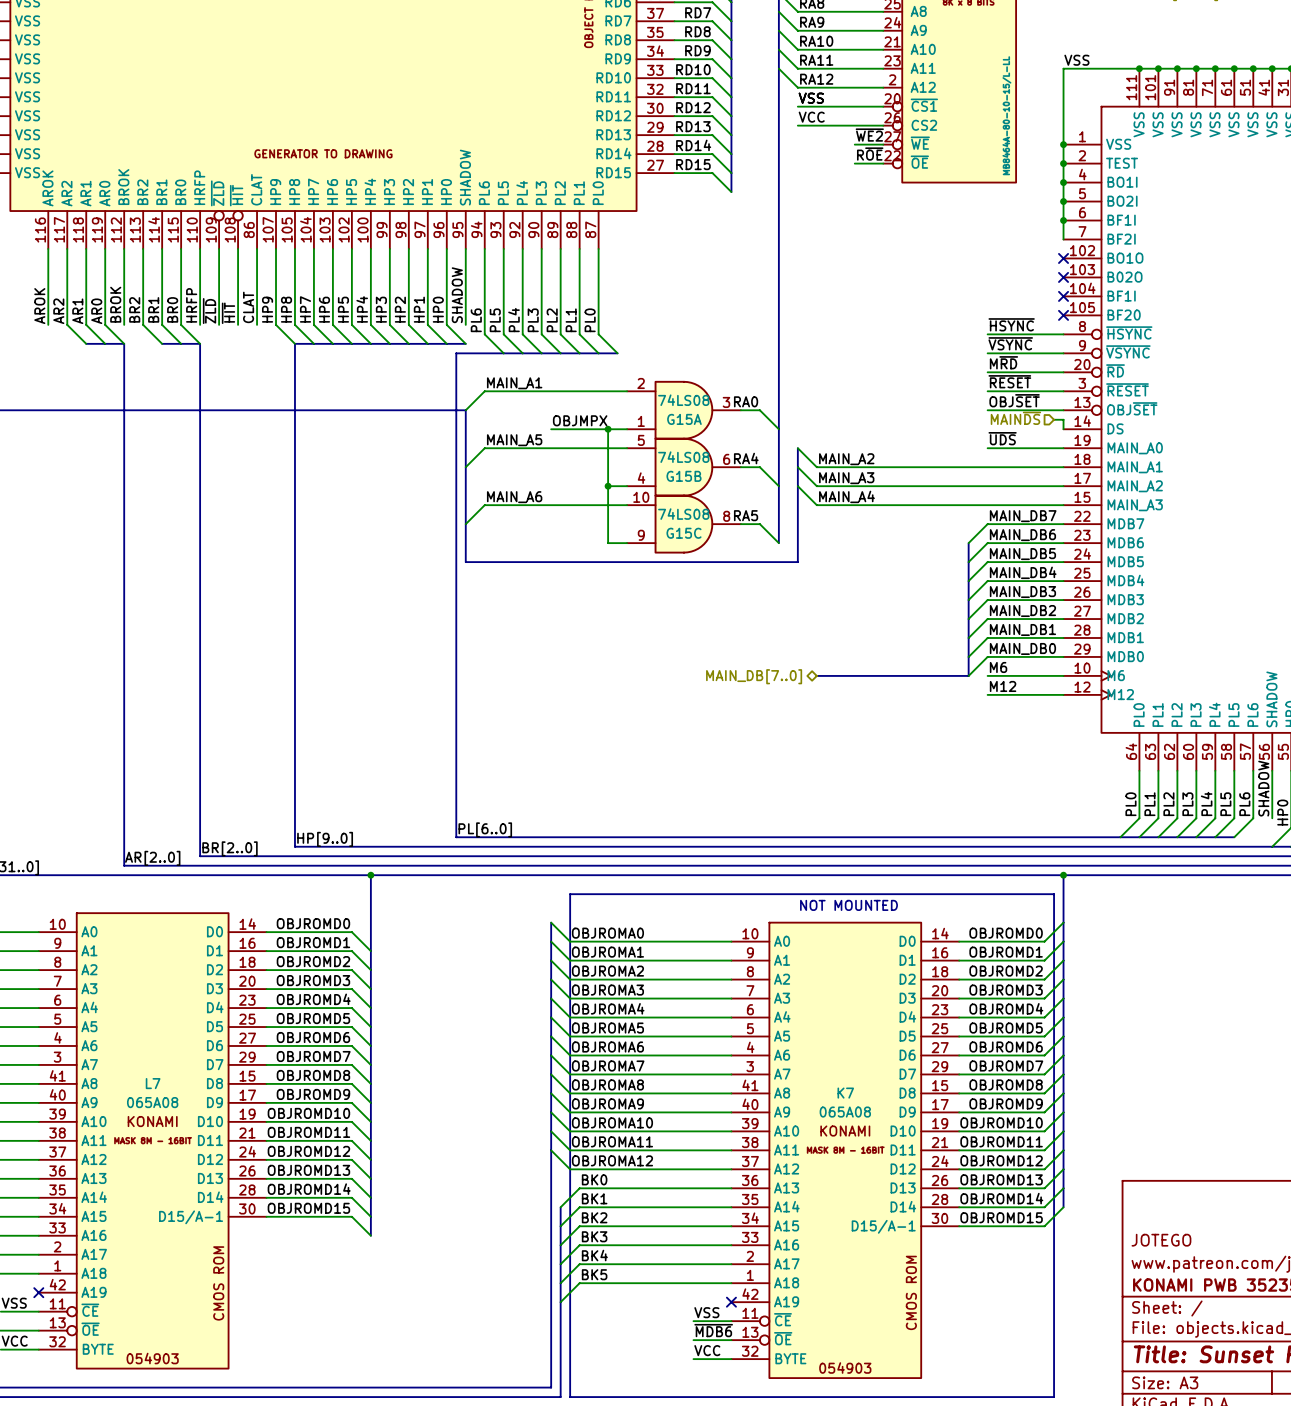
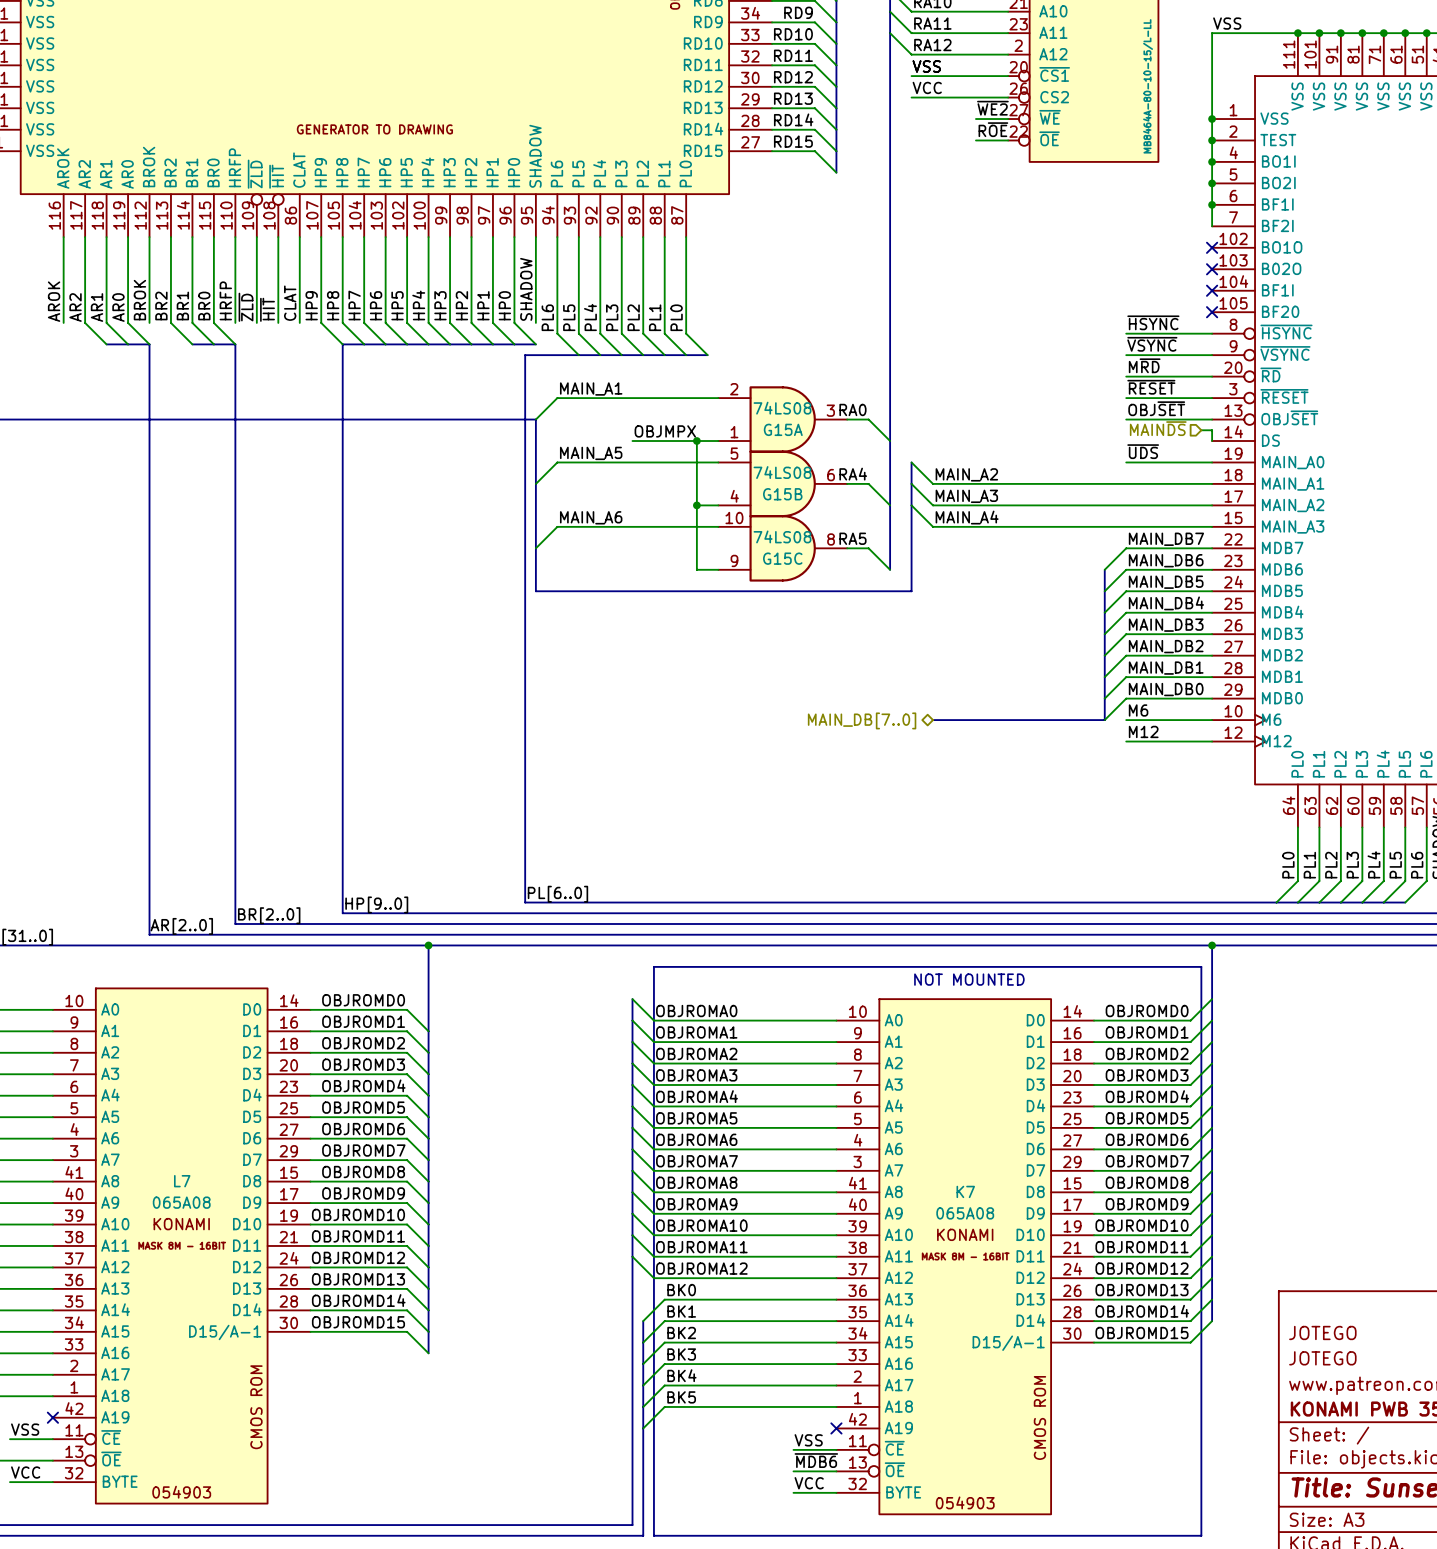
title block: none -> JOTEGO (1322, 1332)

